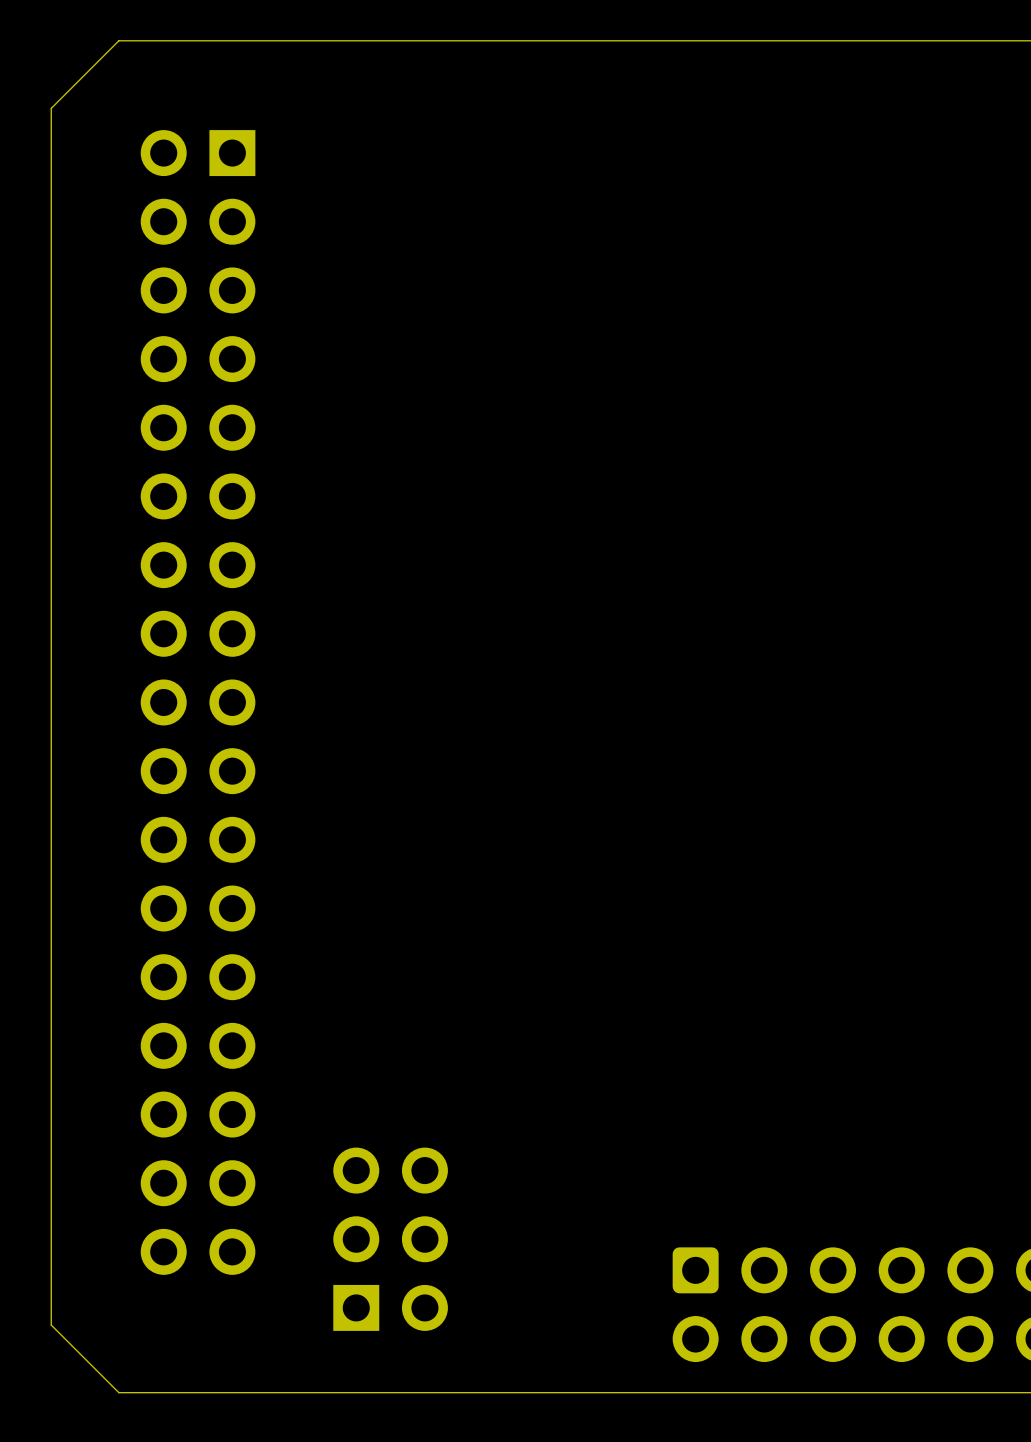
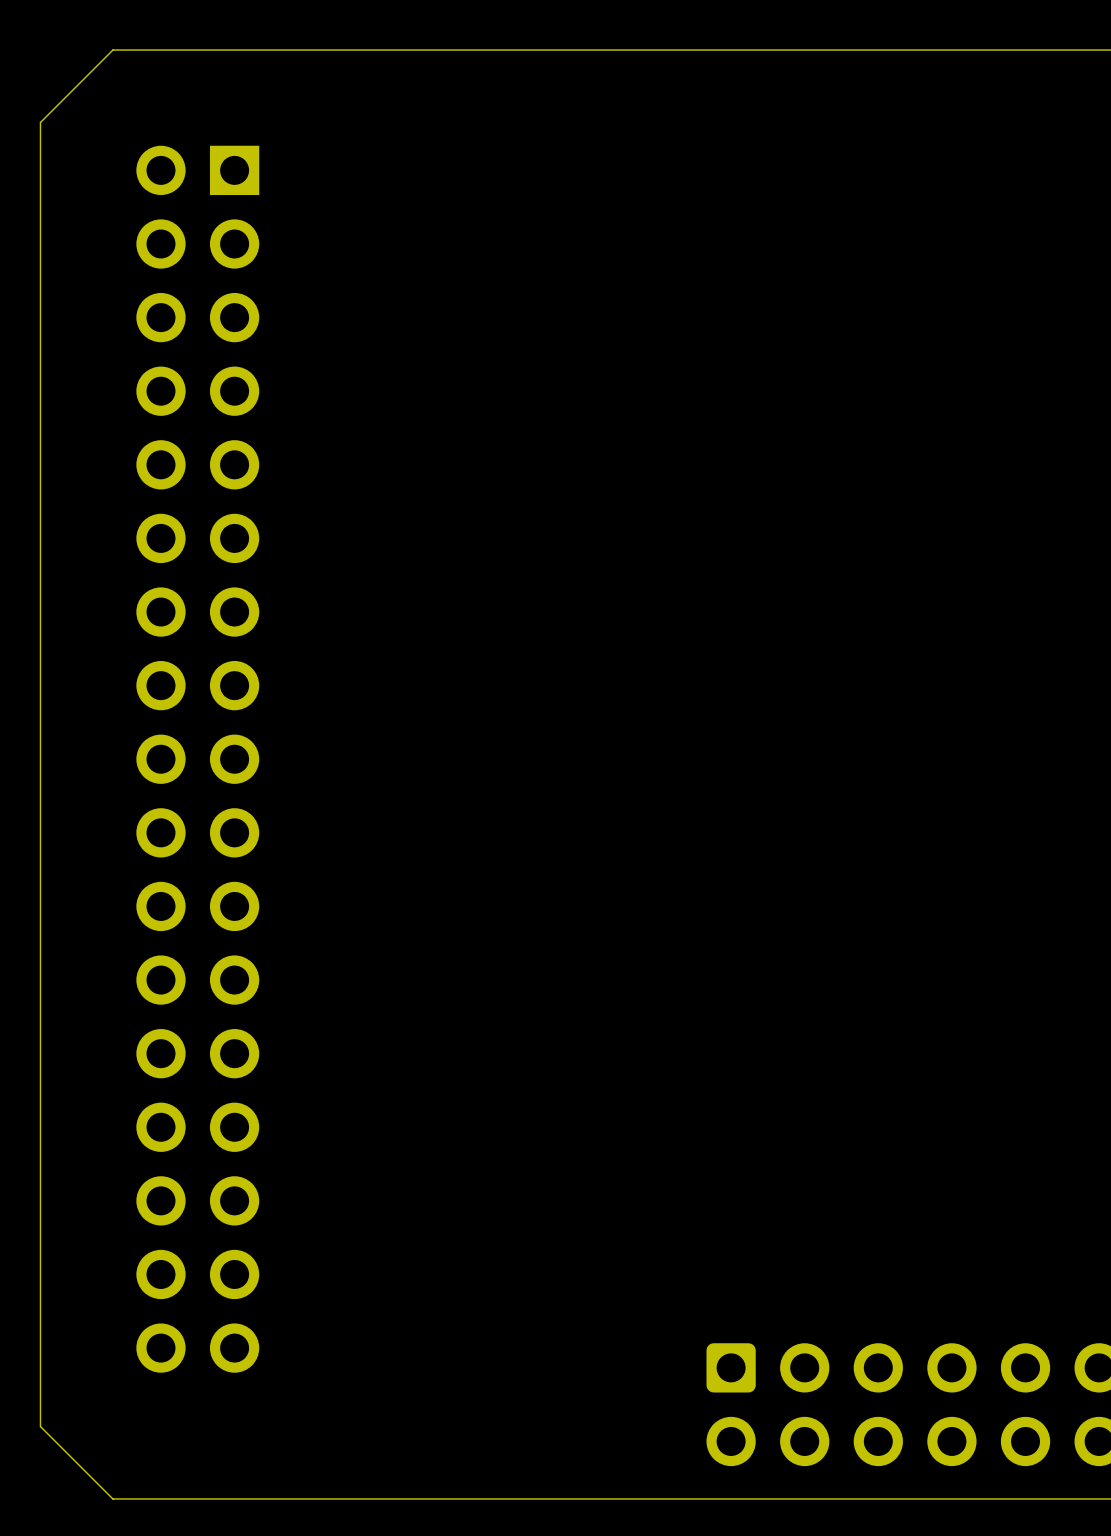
part: (390, 1239) -> none

